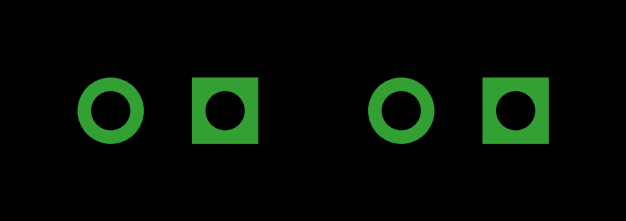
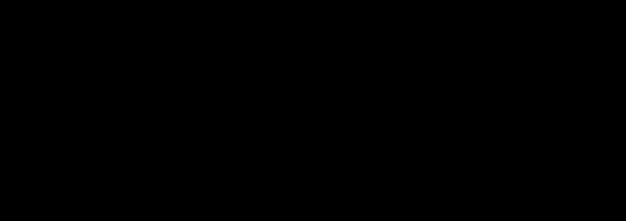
part: (167, 110) -> none
part: (458, 110) -> none

